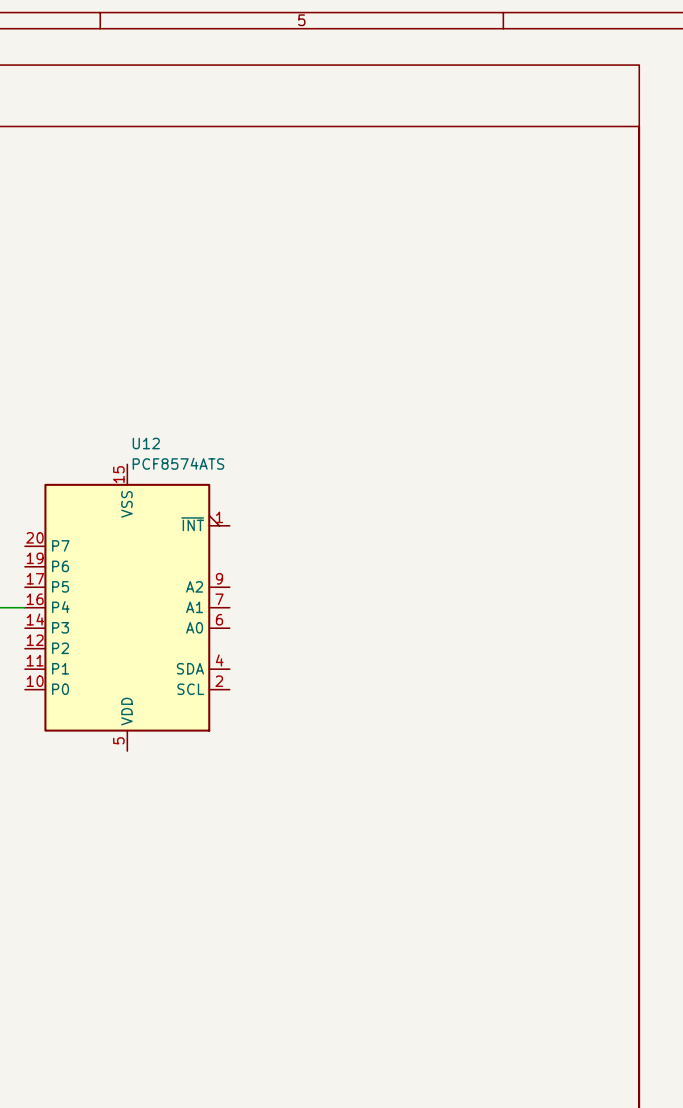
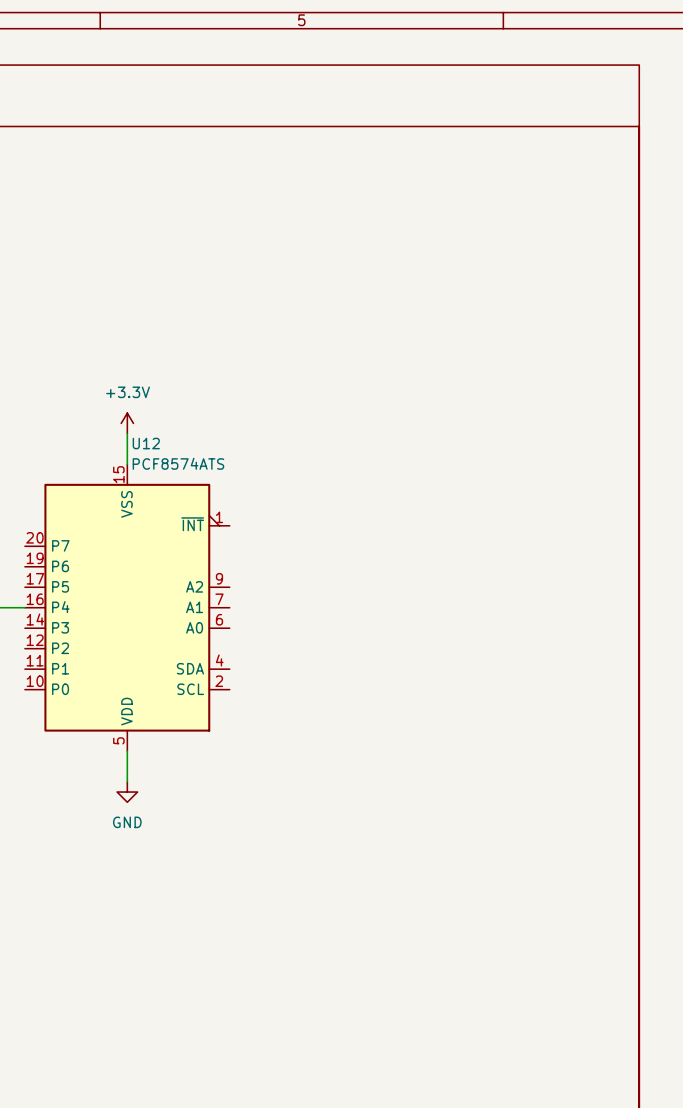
power symbol: none -> +3.3V (127, 423)
wire: none -> (127, 433) (127, 464)
wire: none -> (127, 751) (127, 781)
power symbol: none -> GND (127, 792)

